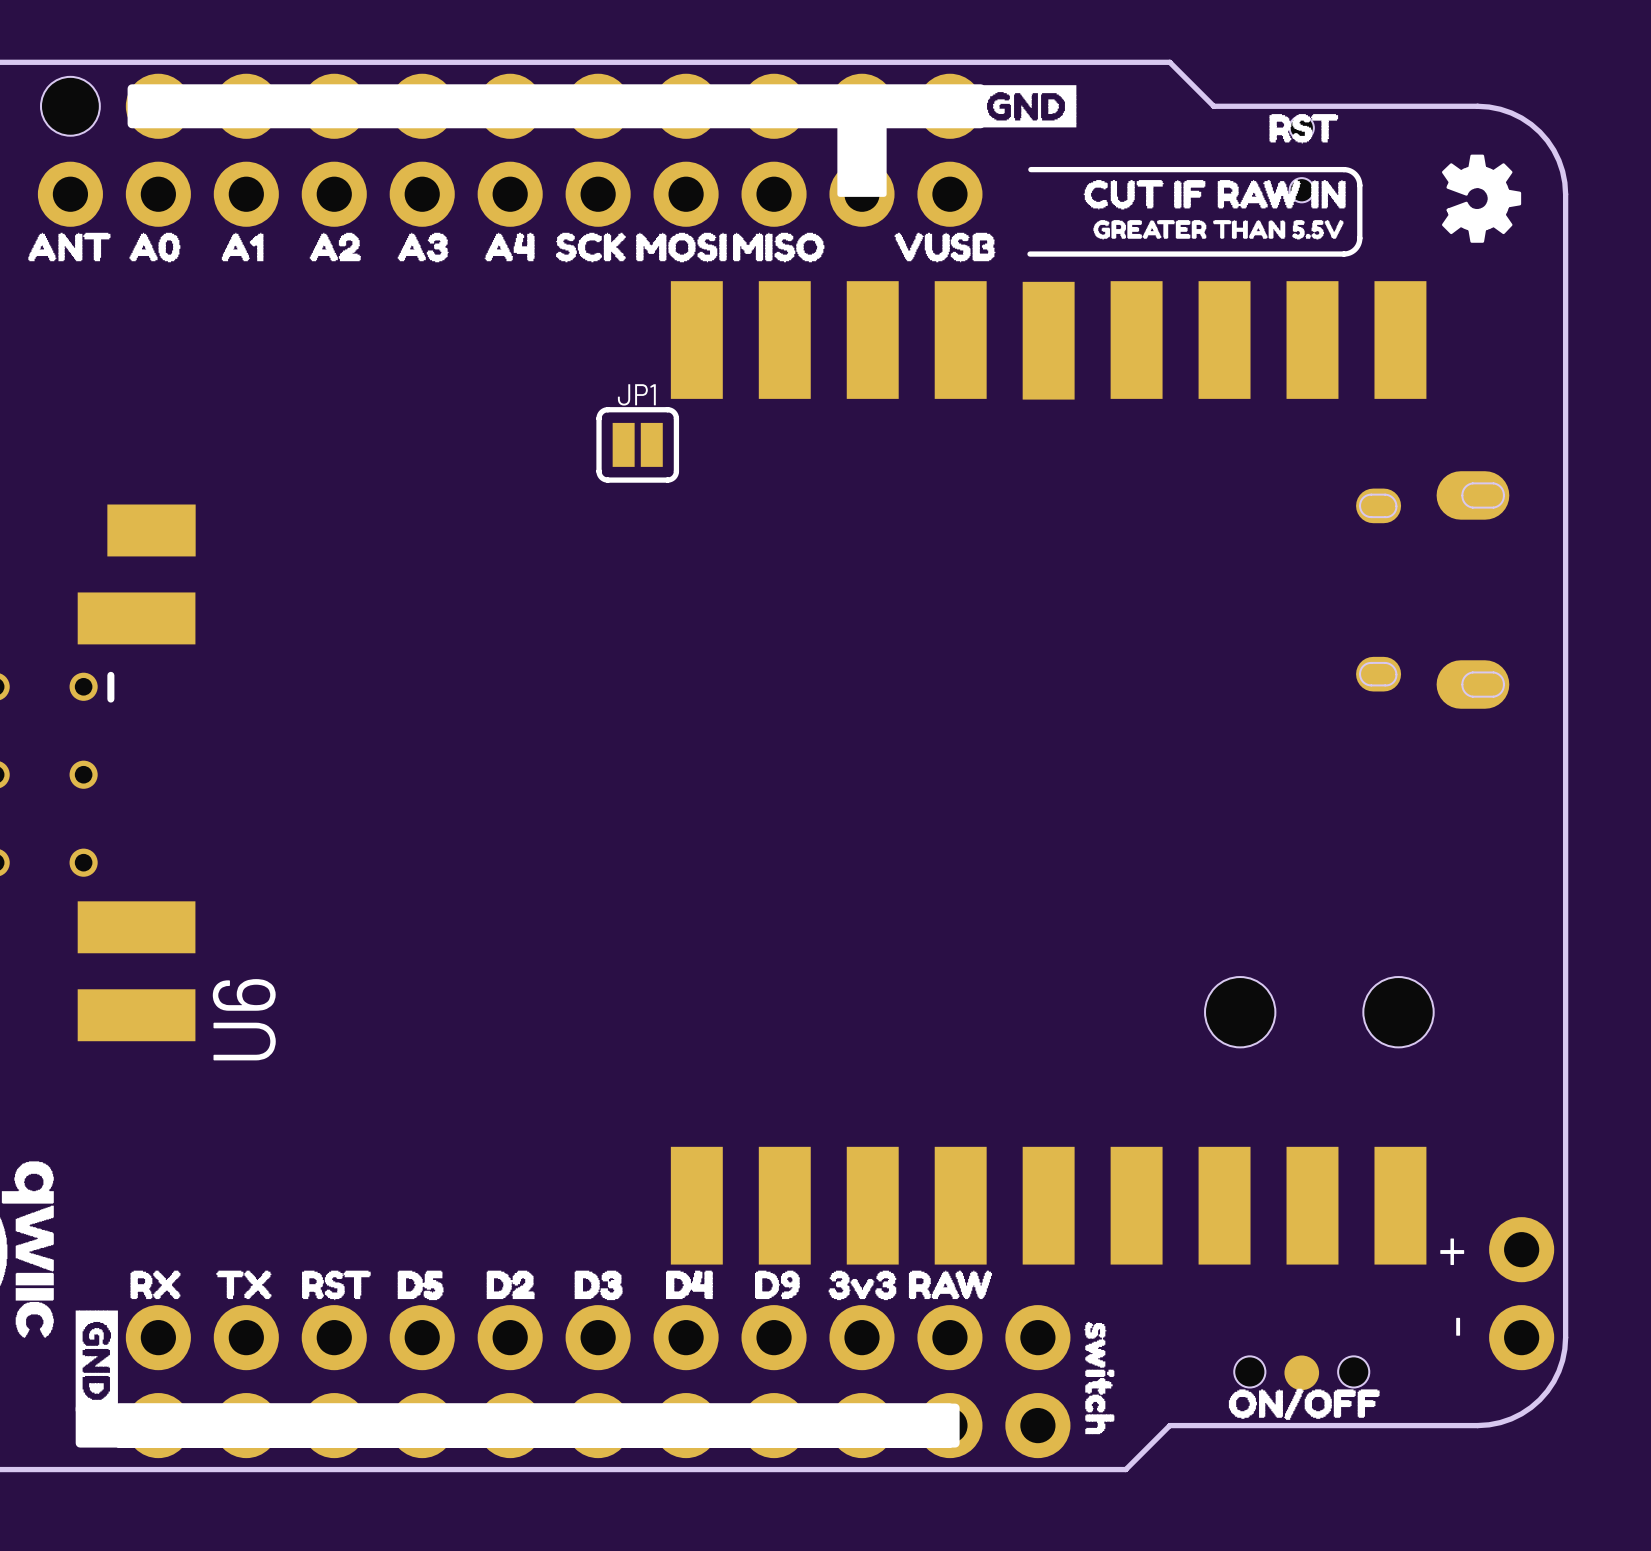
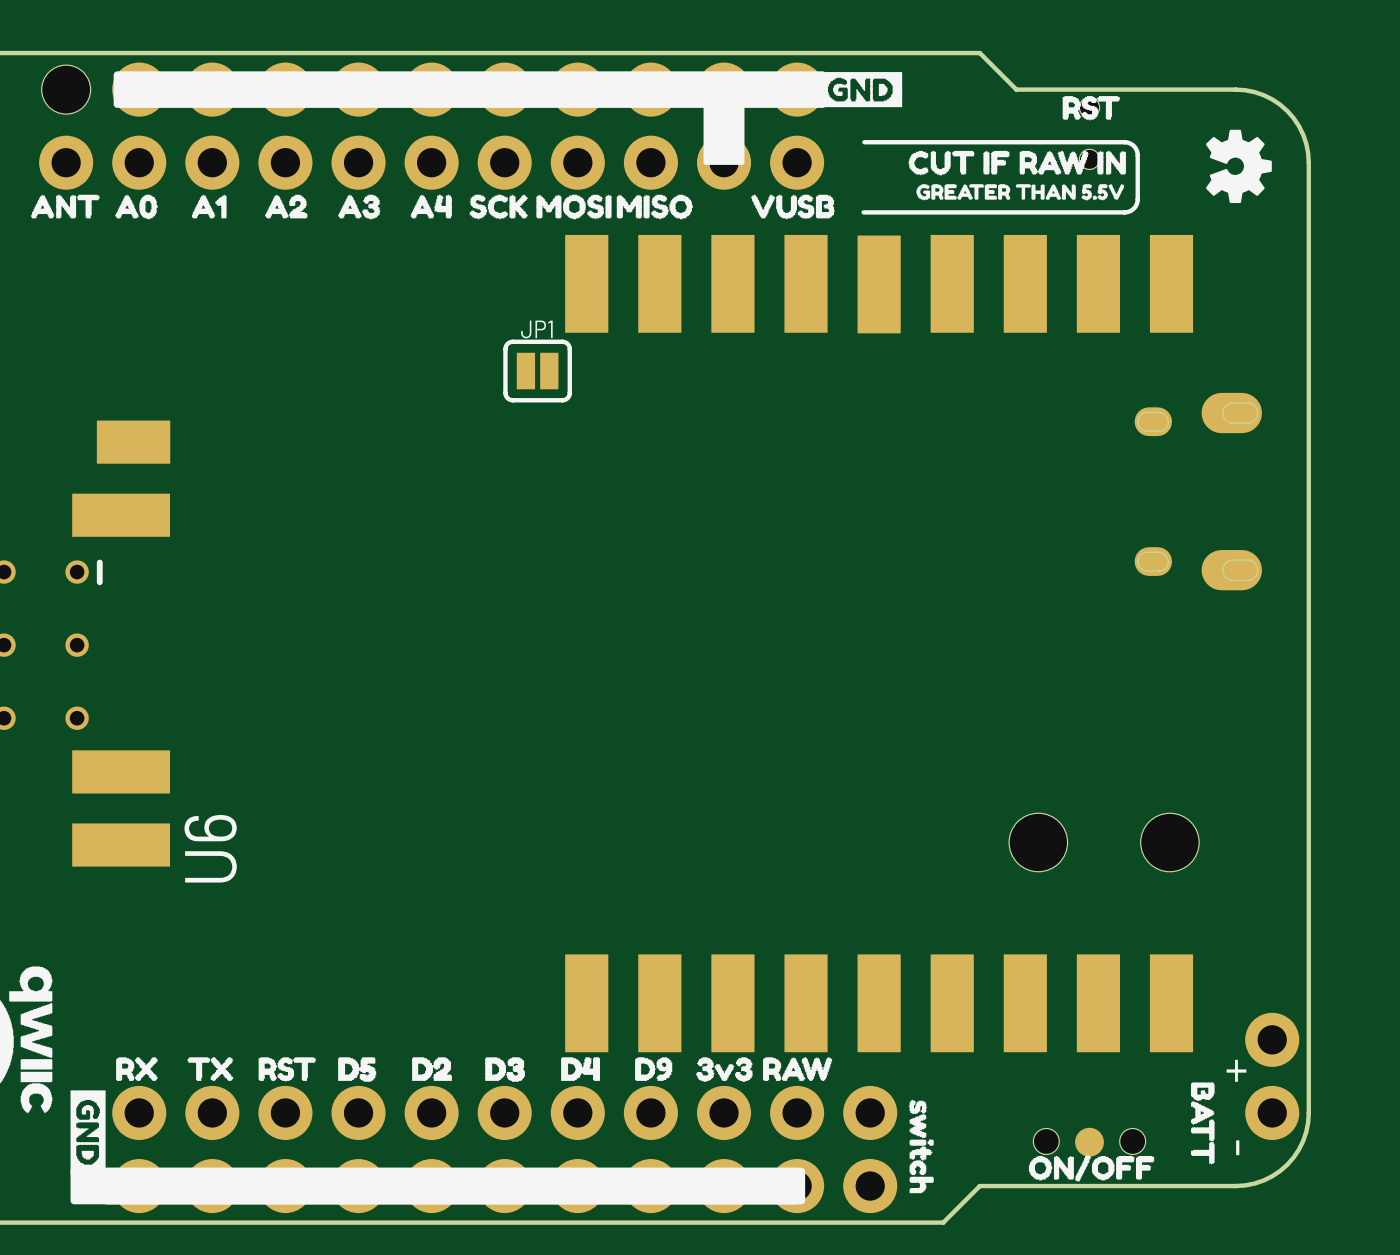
text position: + (1452, 1251) -> + (1236, 1070)
drawing: none -> [1191, 1082, 1215, 1165]
text position: - (1458, 1326) -> - (1237, 1147)

